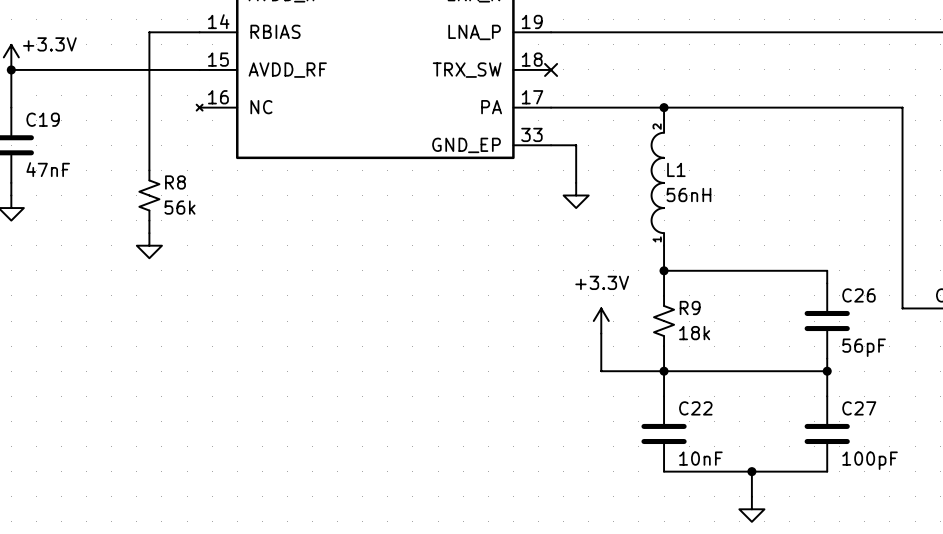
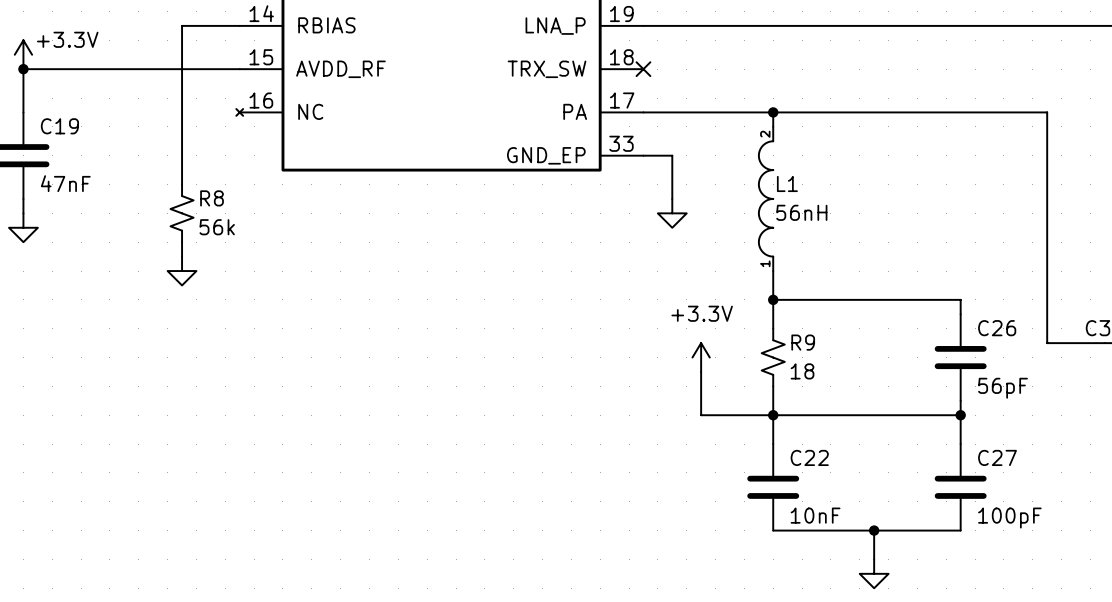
R9 value: 18k (694, 333) -> 18 (802, 371)

